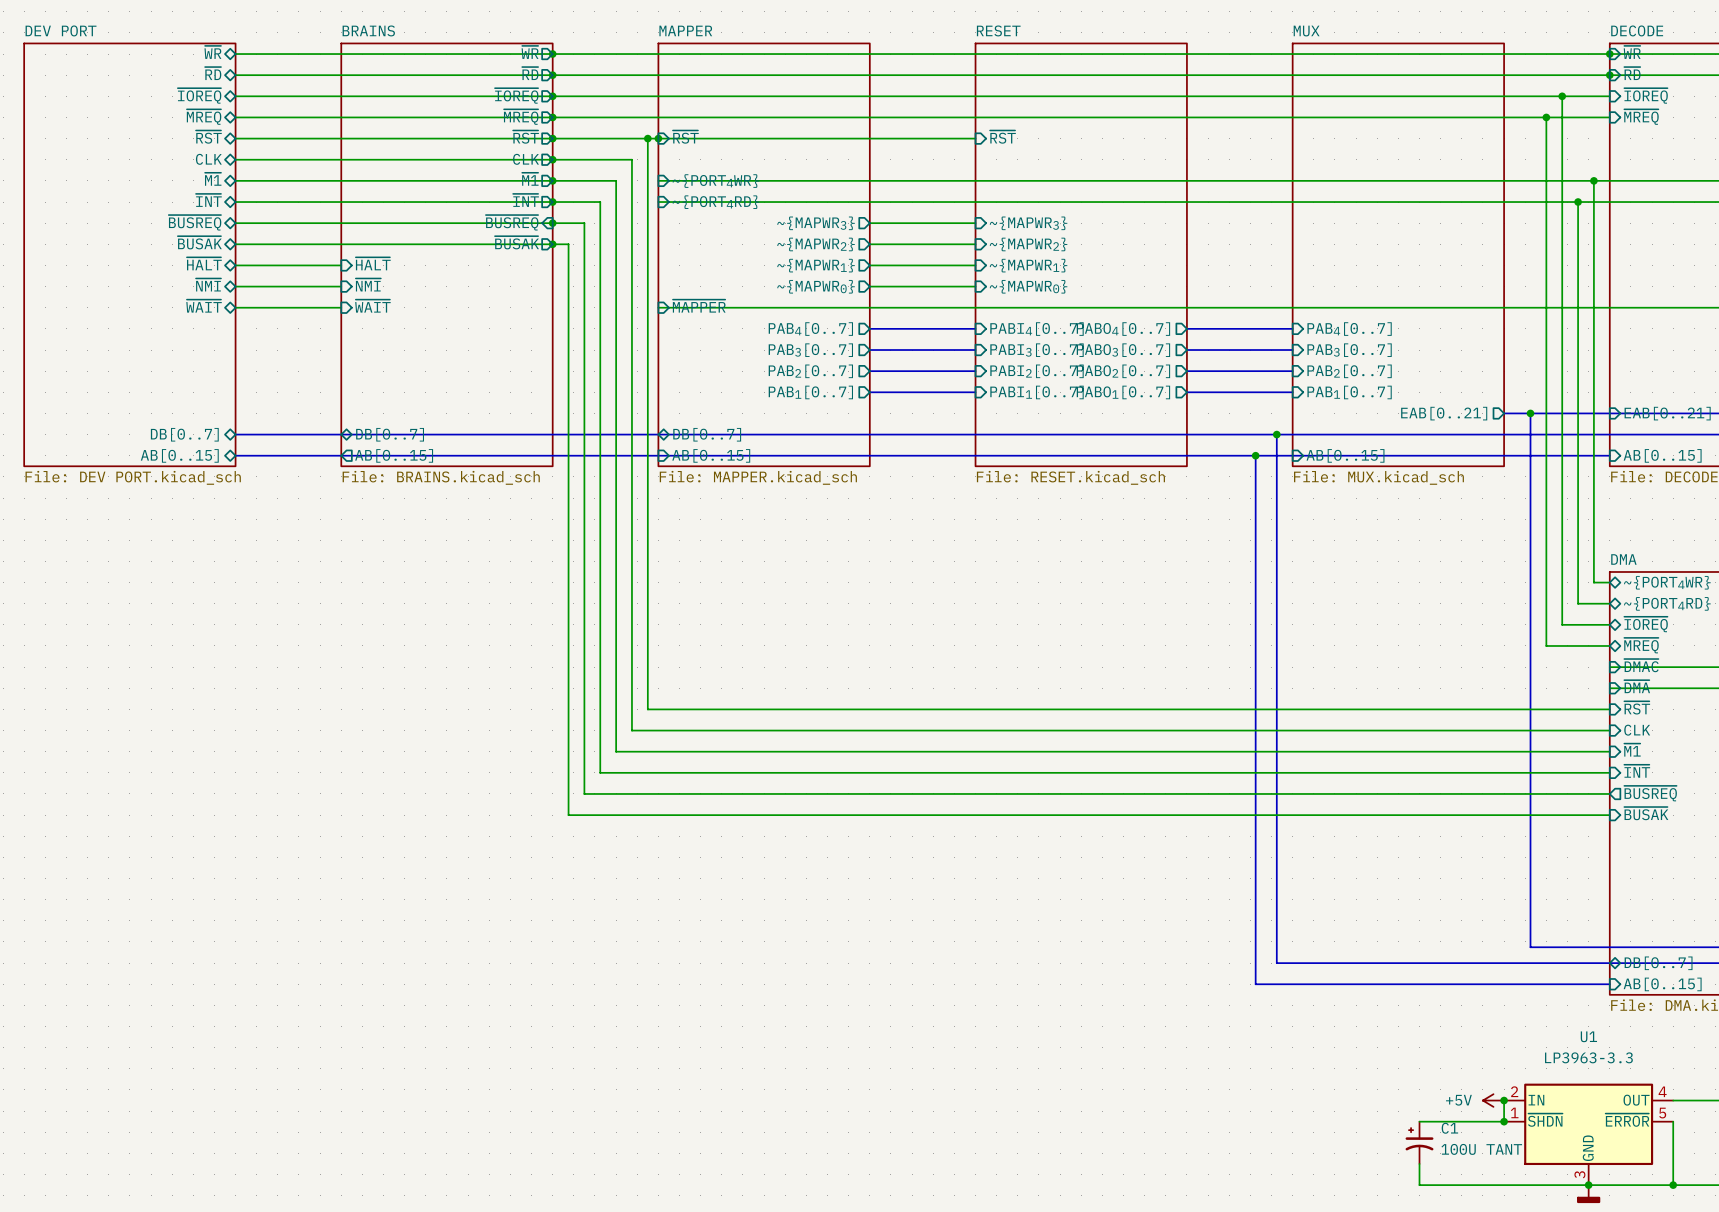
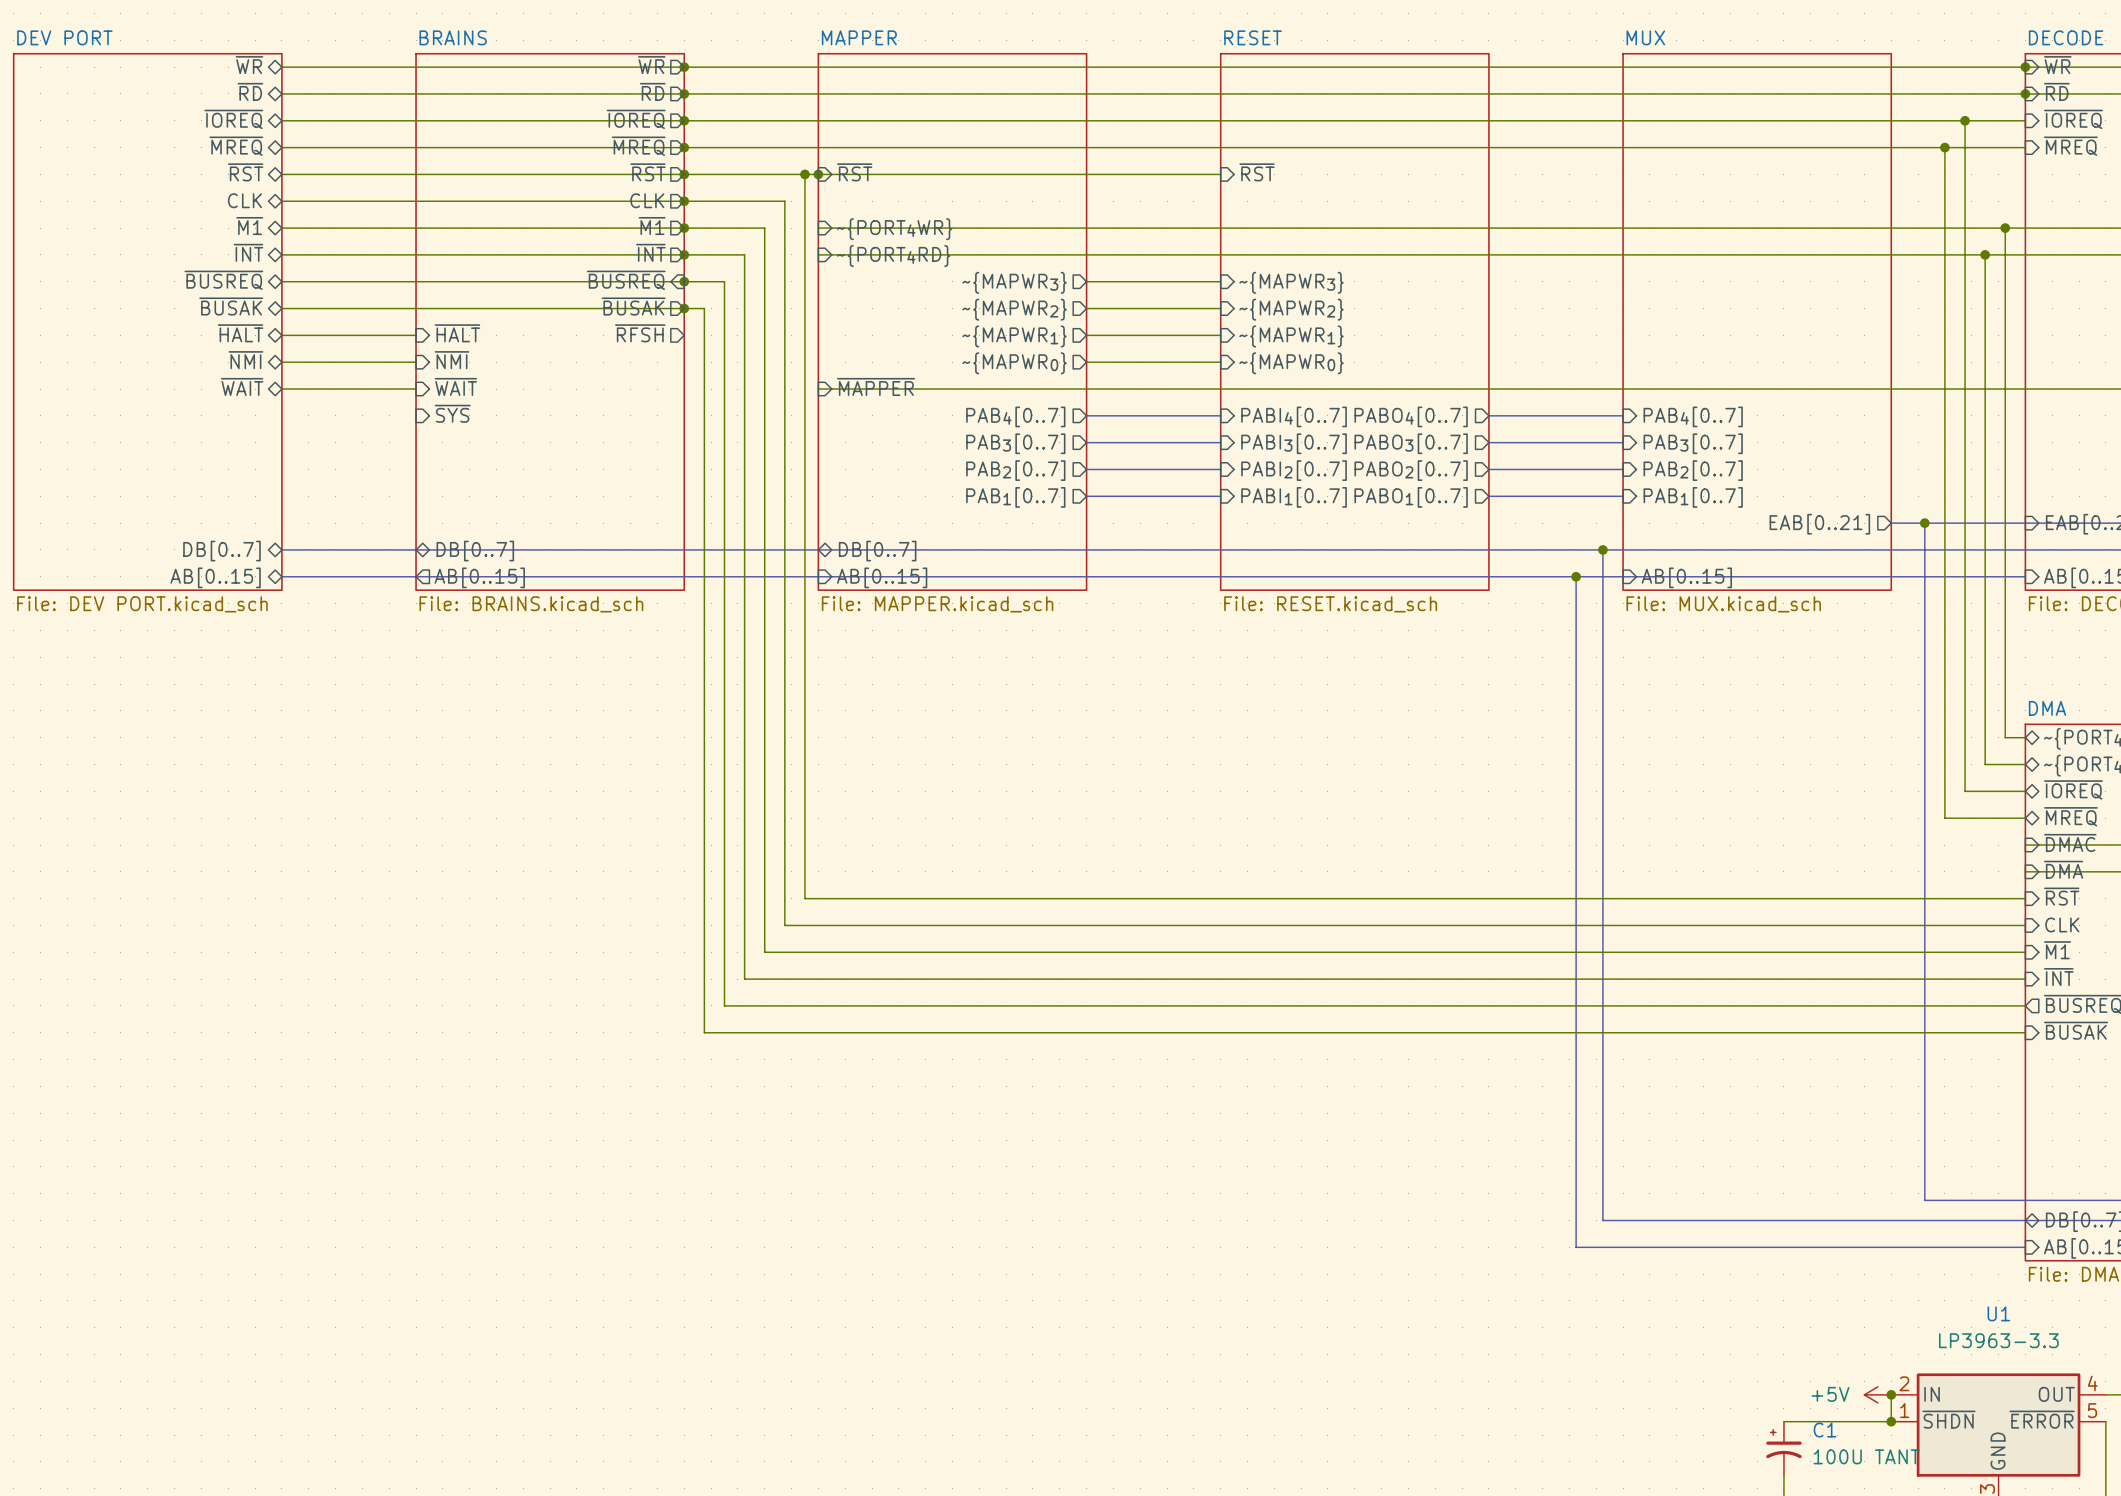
sheet pin: none -> ~{RFSH} (640, 333)
sheet pin: none -> ~{SYS} (452, 413)

